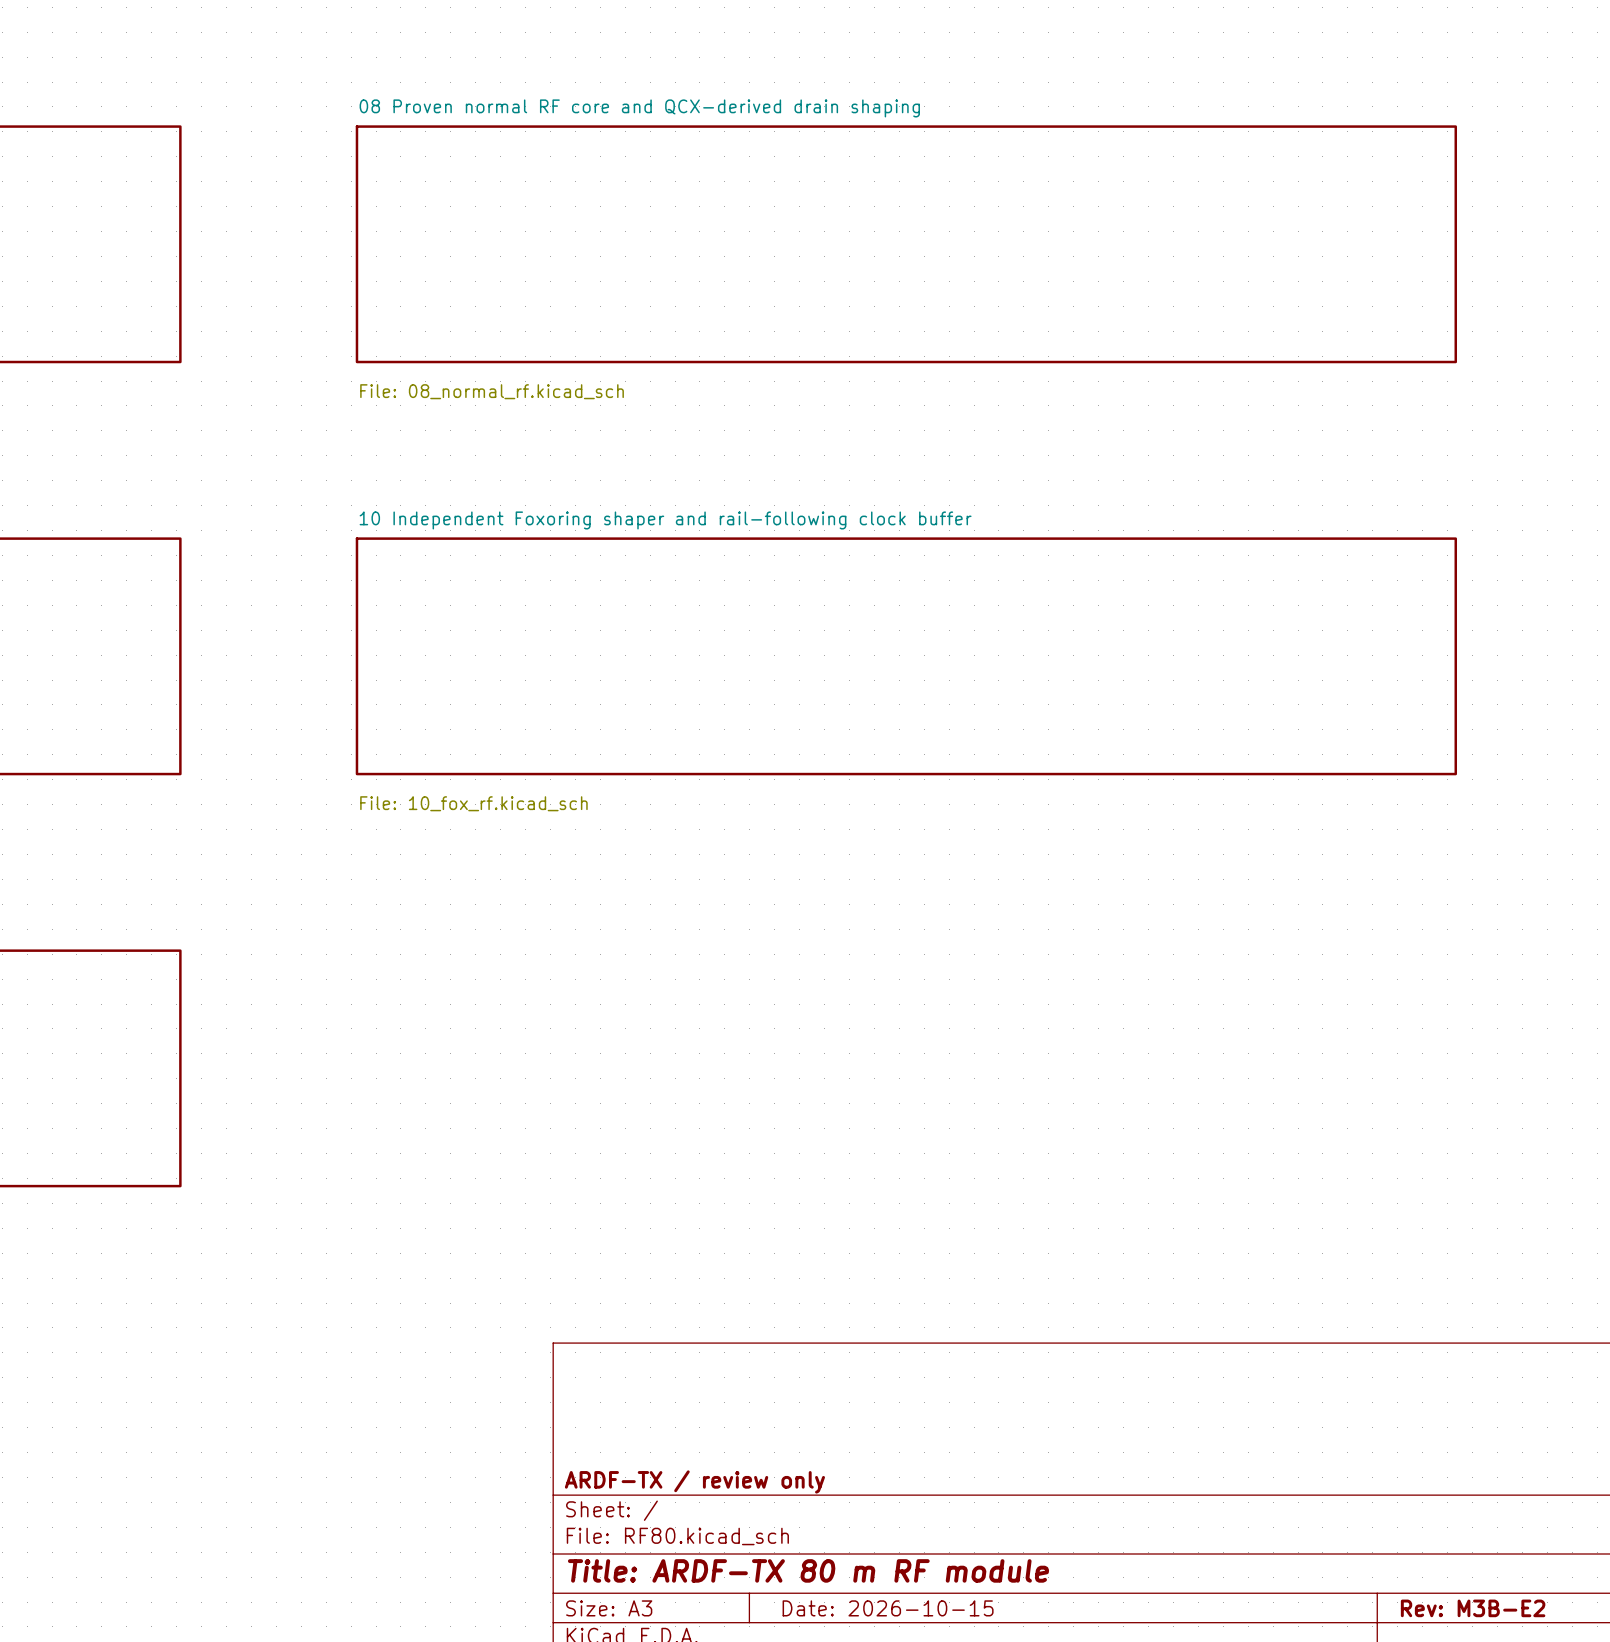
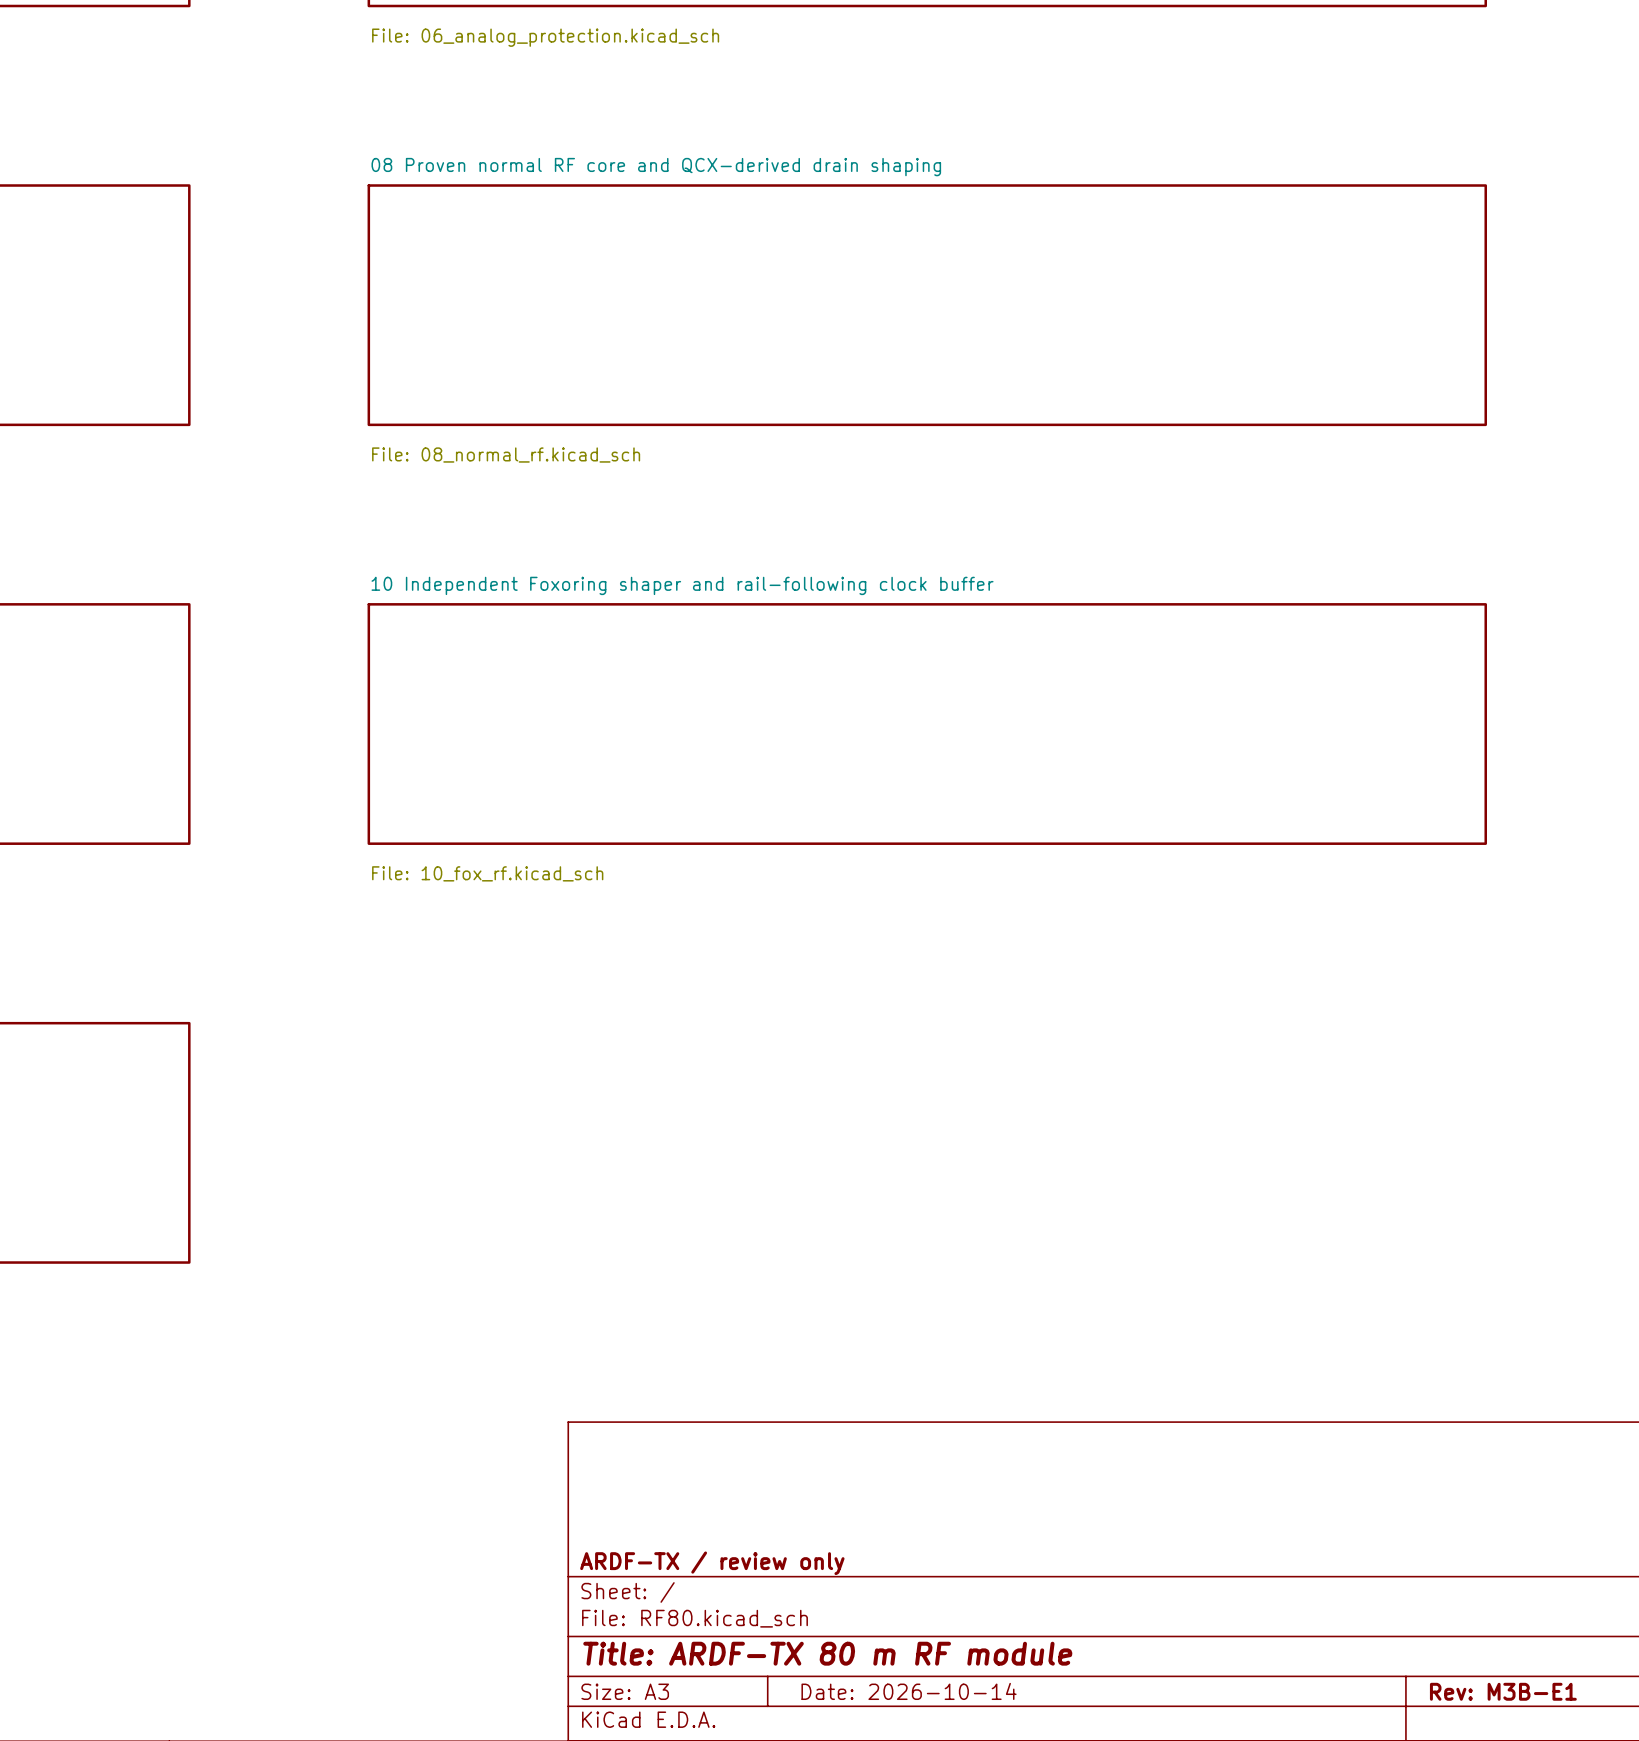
title block: Date: 2026-10-15 (888, 1608) -> Date: 2026-10-14 (909, 1691)
title block: Rev: M3B-E2 (1473, 1608) -> Rev: M3B-E1 (1503, 1691)

